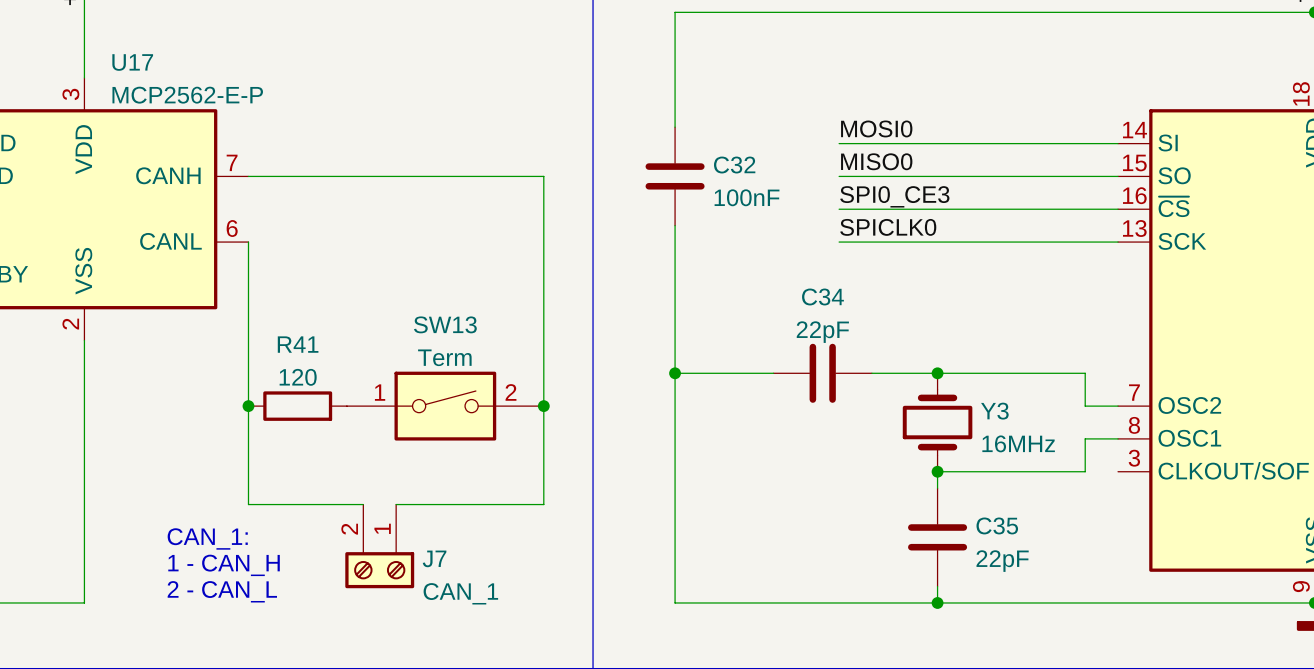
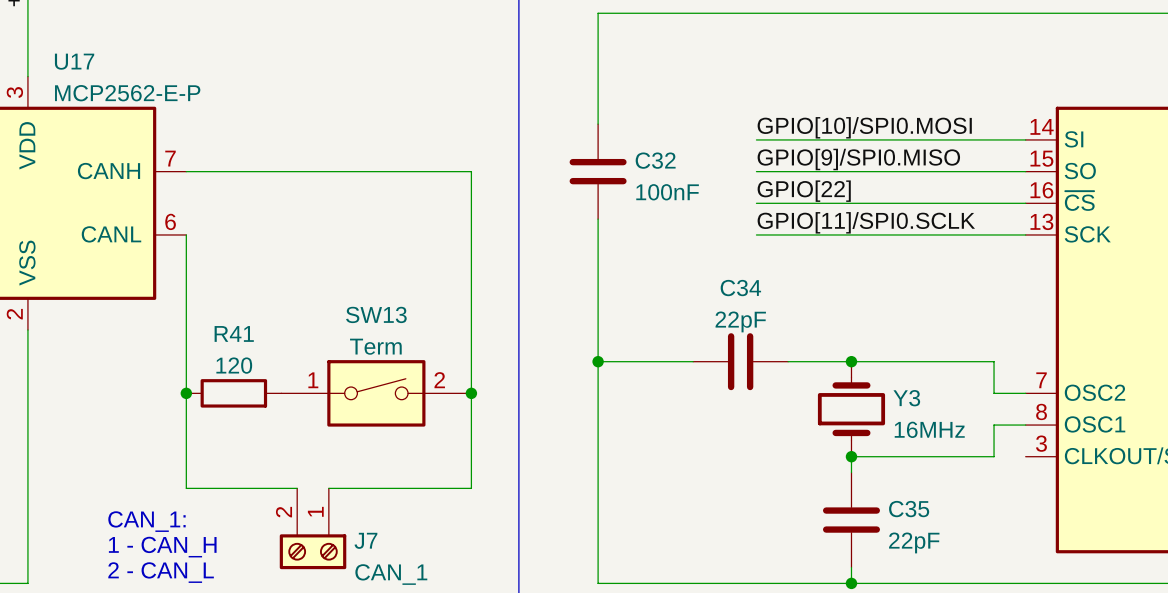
label: MOSI0 (876, 128) -> GPIO[10]/SPI0.MOSI (864, 127)
label: MISO0 (876, 161) -> GPIO[9]/SPI0.MISO (858, 159)
label: SPI0_CE3 (894, 196) -> GPIO[22] (804, 191)
label: SPICLK0 (888, 227) -> GPIO[11]/SPI0.SCLK (866, 222)

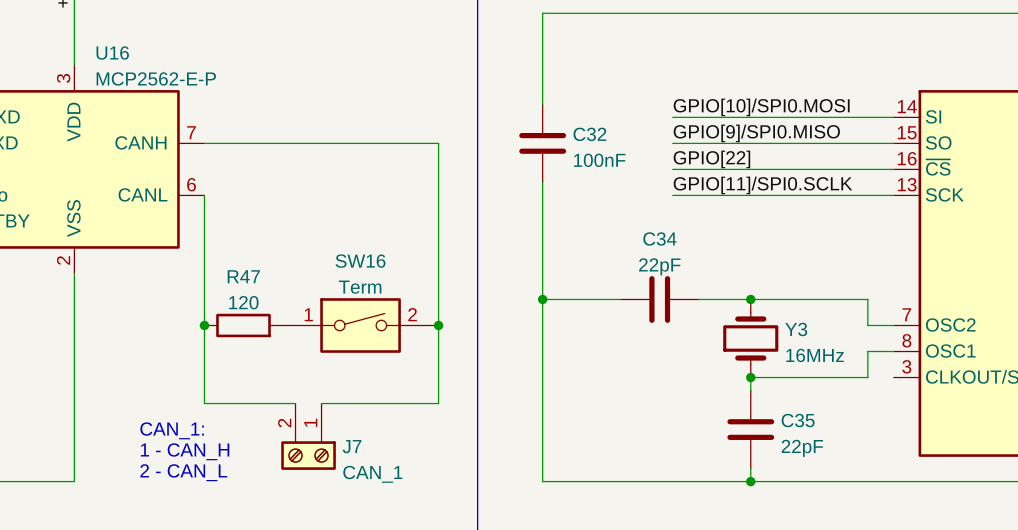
U17 name: U17 (74, 61) -> U16 (112, 52)
SW13 name: SW13 (376, 314) -> SW16 (360, 261)
R41 name: R41 (234, 333) -> R47 (243, 276)

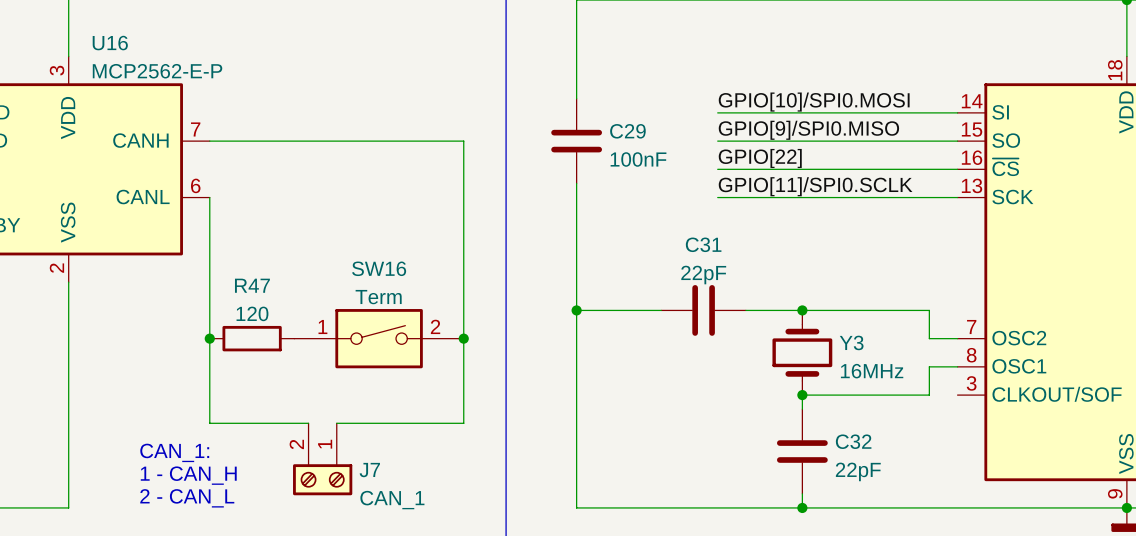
C32 name: C32 (589, 134) -> C29 (627, 131)
C34 name: C34 (659, 238) -> C31 (703, 244)
C35 name: C35 (798, 420) -> C32 (853, 441)

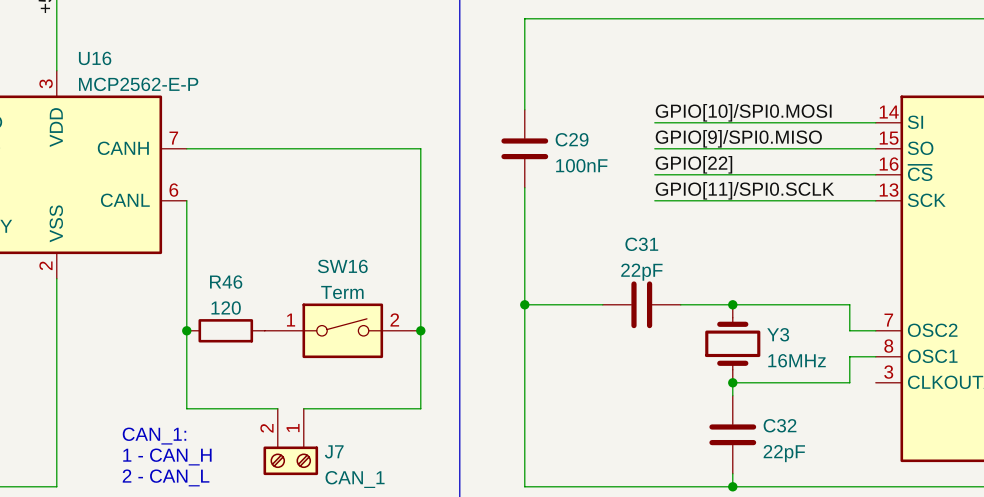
R47 name: R47 (252, 285) -> R46 (226, 282)

